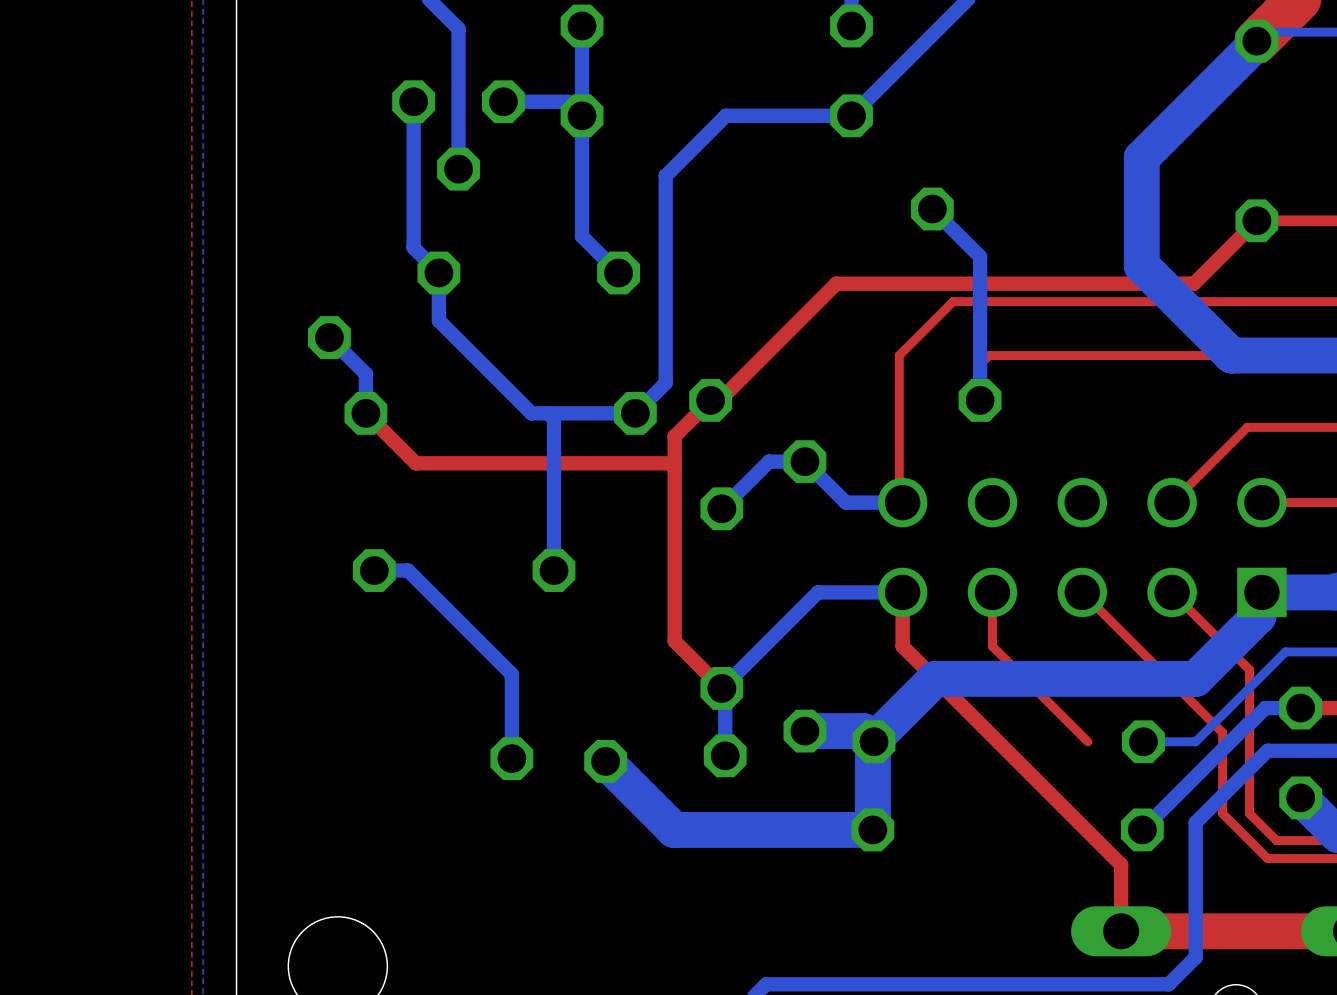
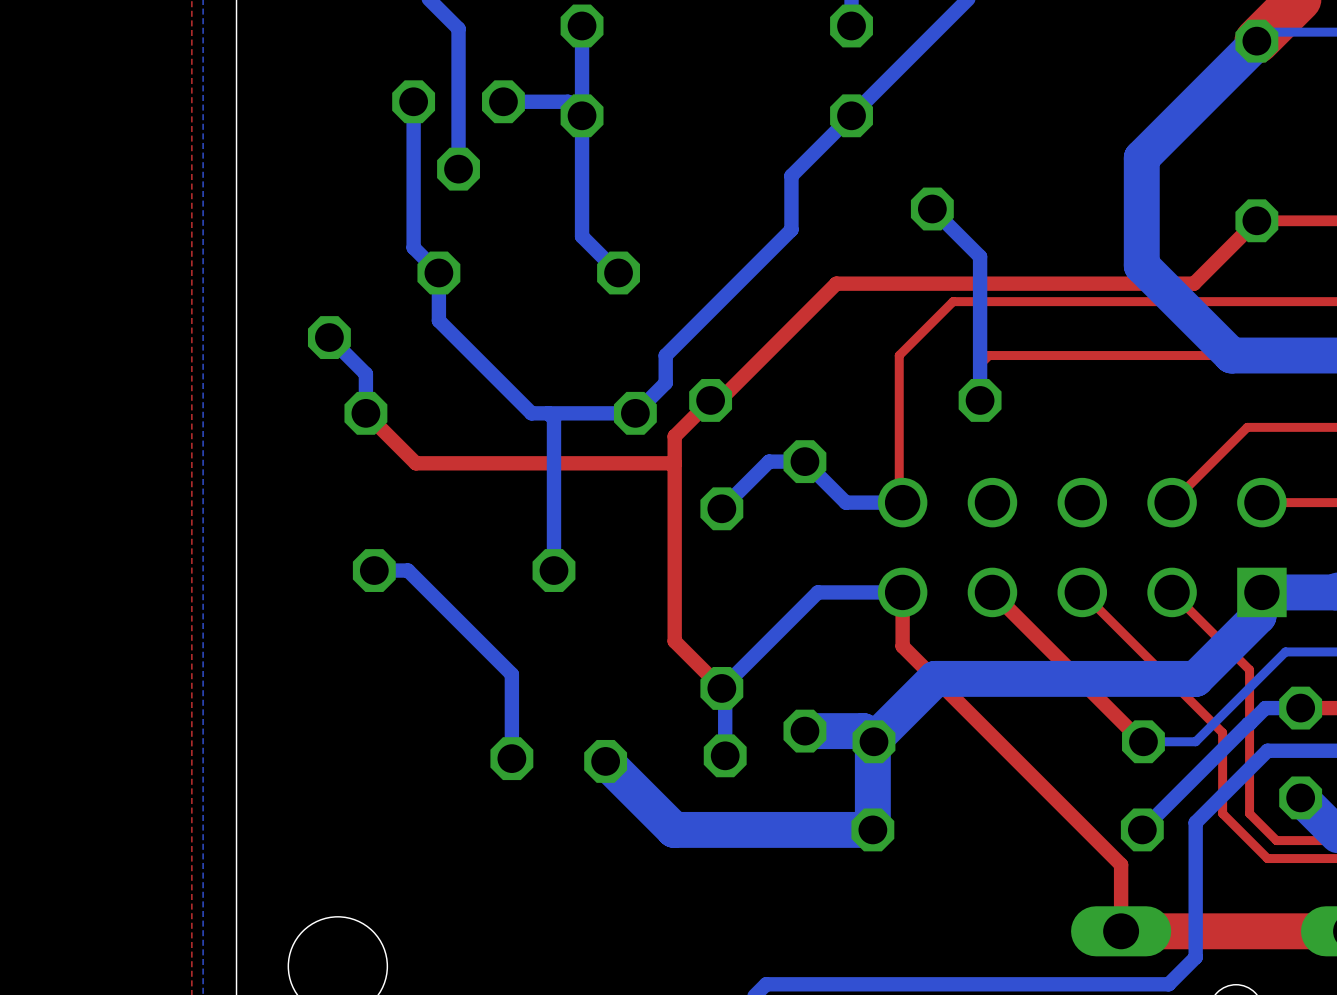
bottom track: (851, 115) (725, 115) (665, 175) (665, 355) -> (851, 115) (791, 175) (791, 229) (665, 355)
top track: (992, 592) (992, 646) (1087, 741) -> (992, 592) (1143, 741)

